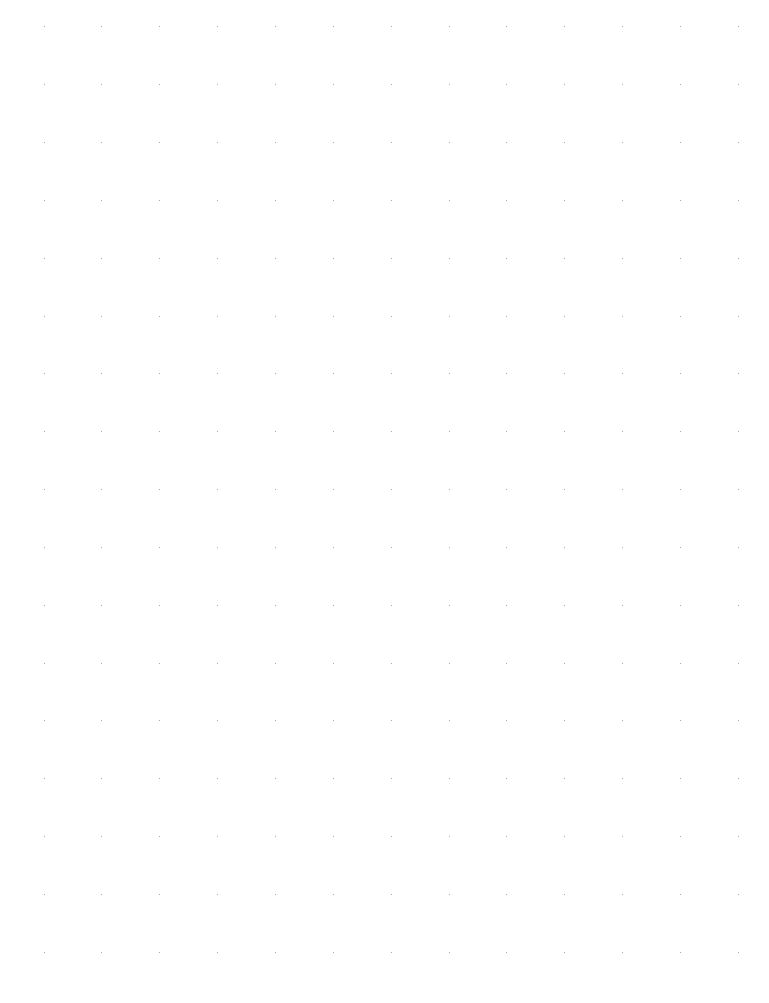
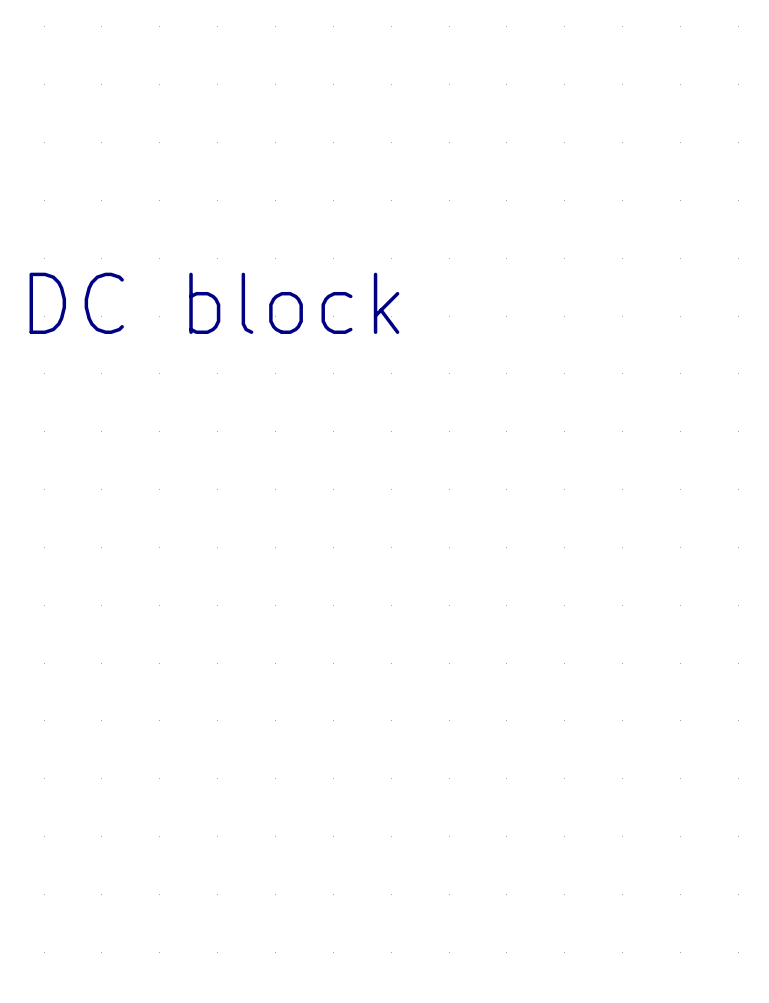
text: none -> DC block (214, 303)

